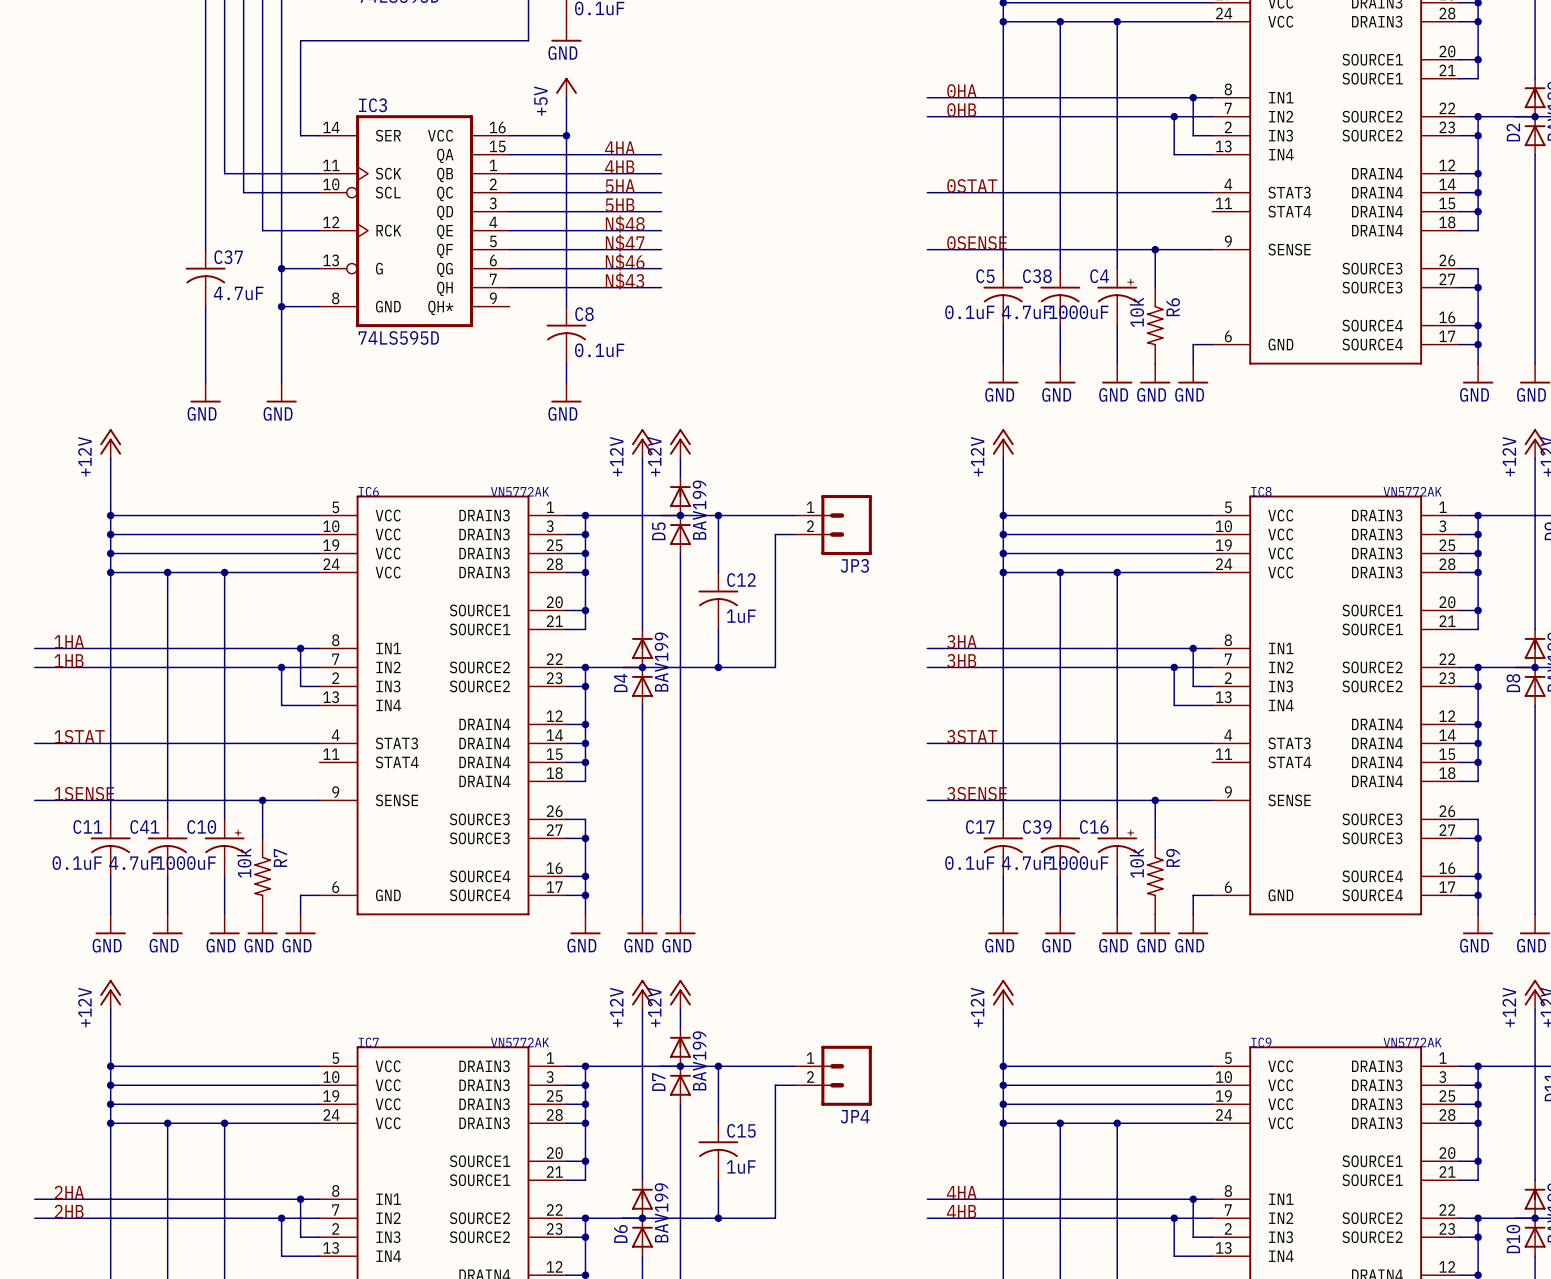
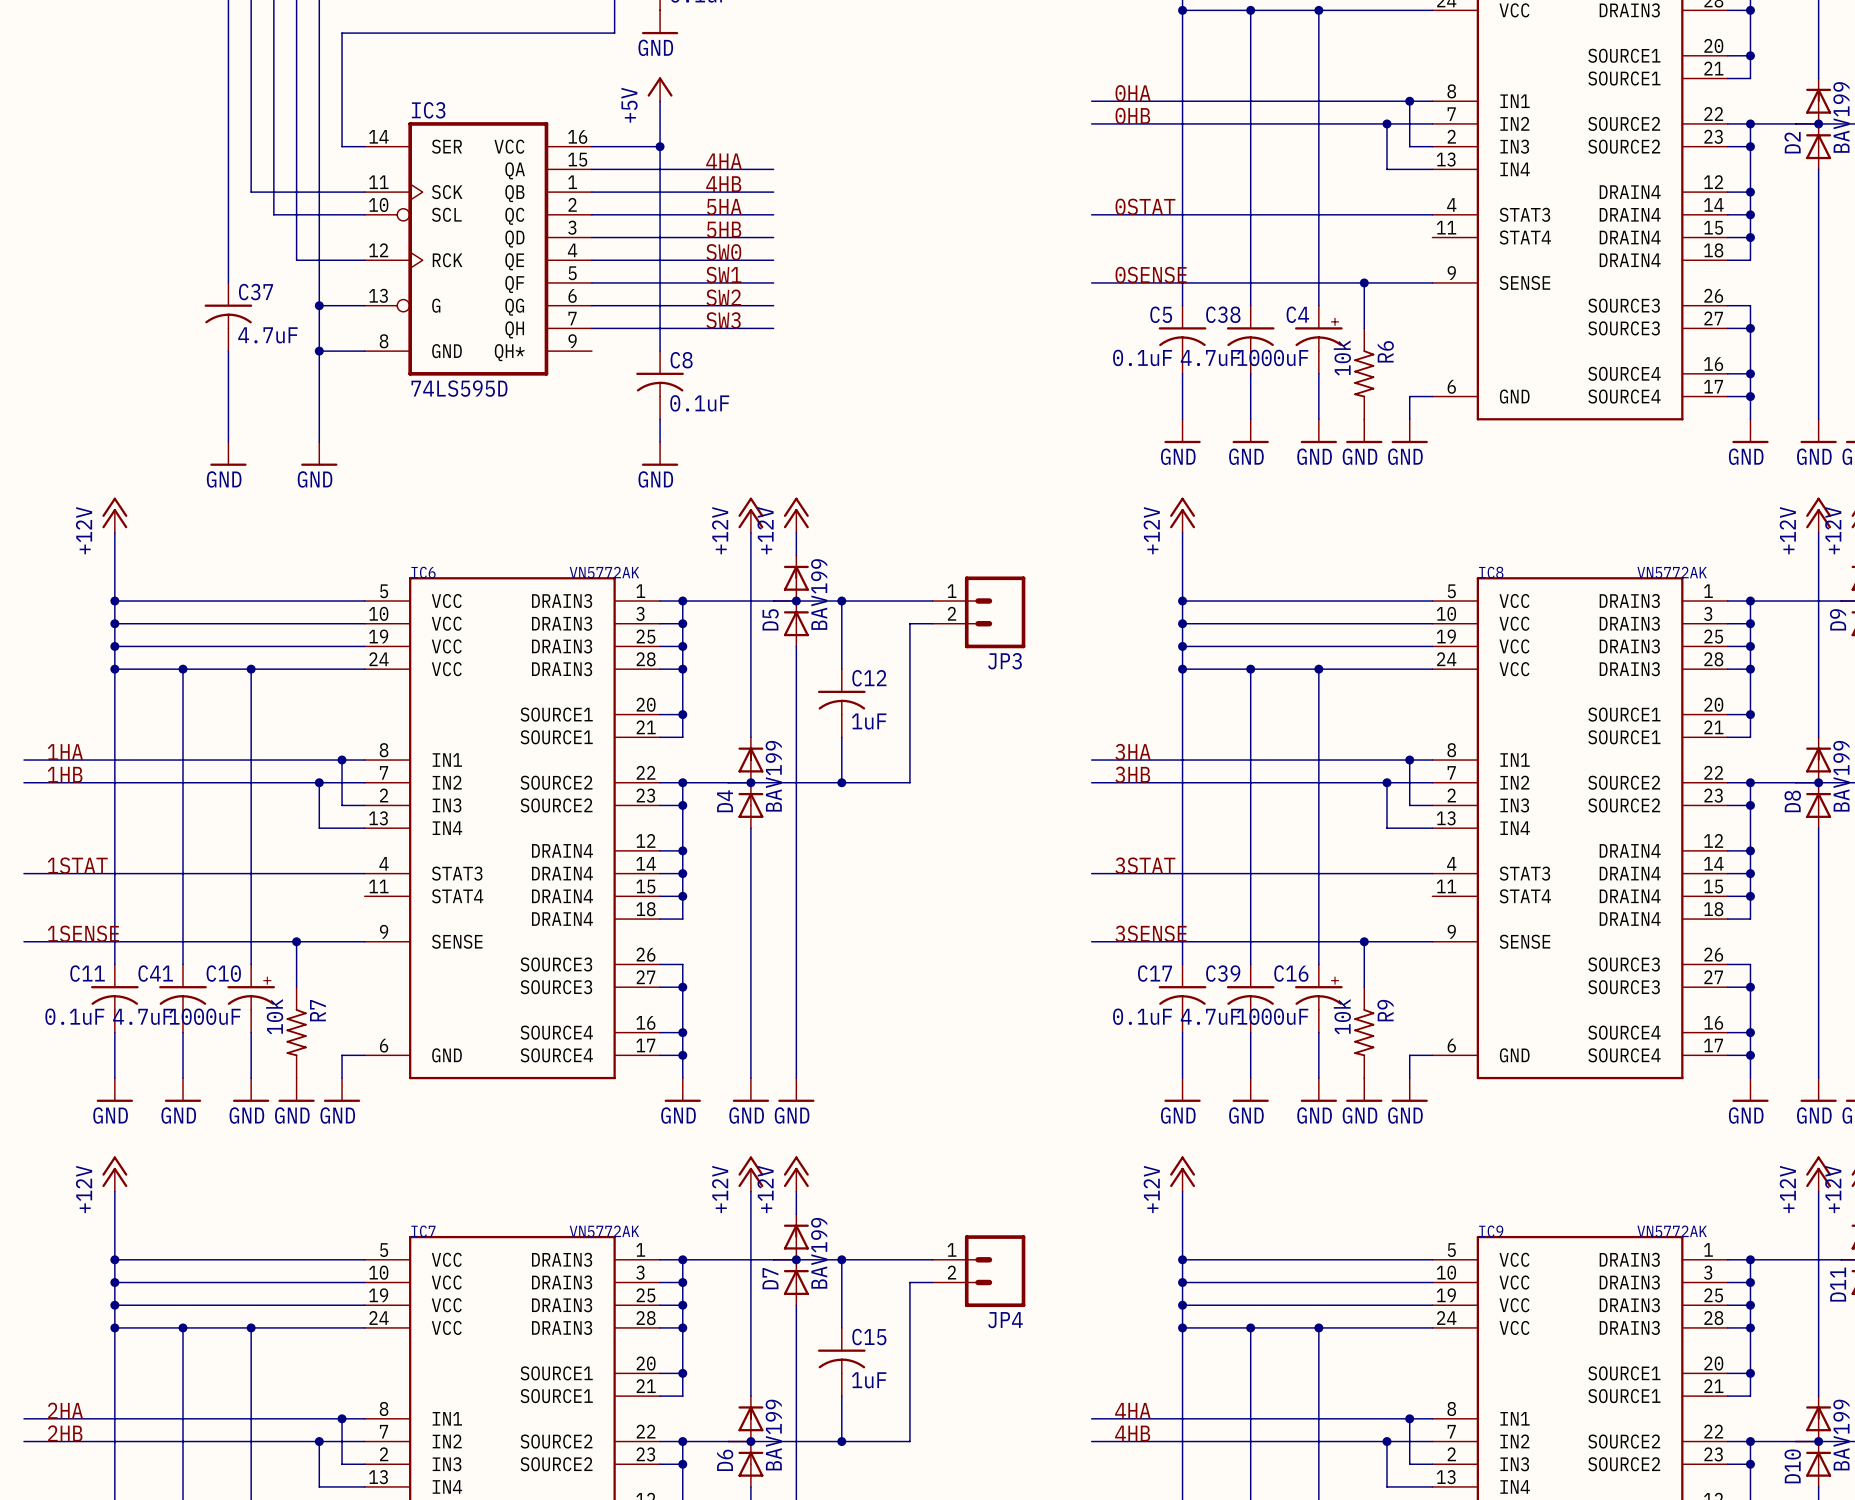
label: N$48 (625, 224) -> SW0 (723, 252)
label: N$47 (625, 242) -> SW1 (723, 275)
label: N$46 (625, 261) -> SW2 (723, 297)
label: N$43 (625, 280) -> SW3 (723, 320)

